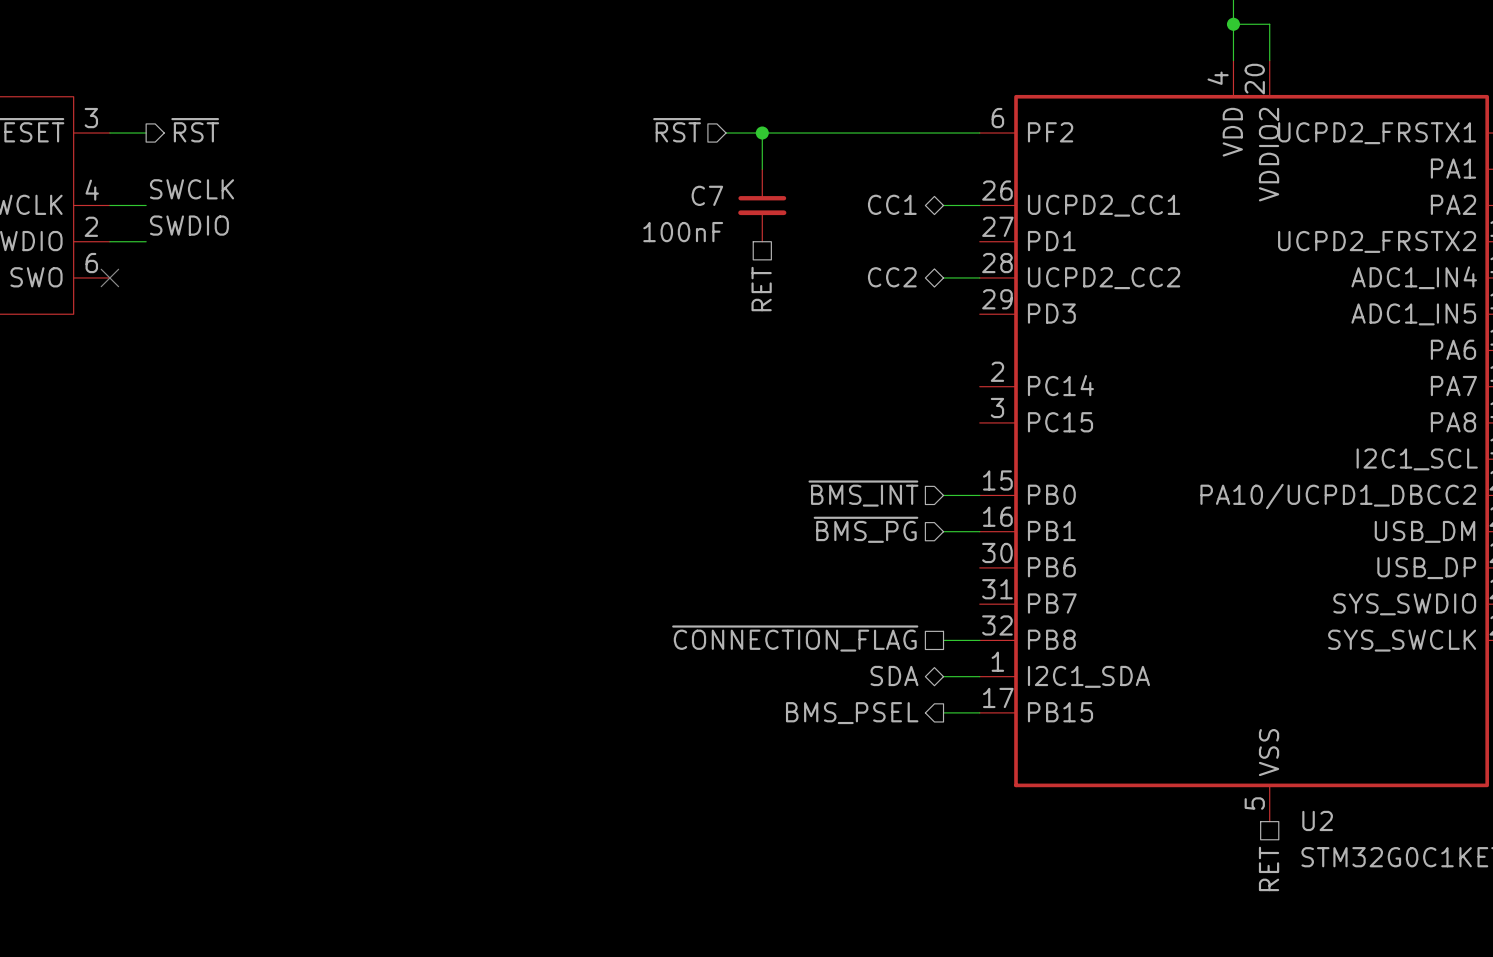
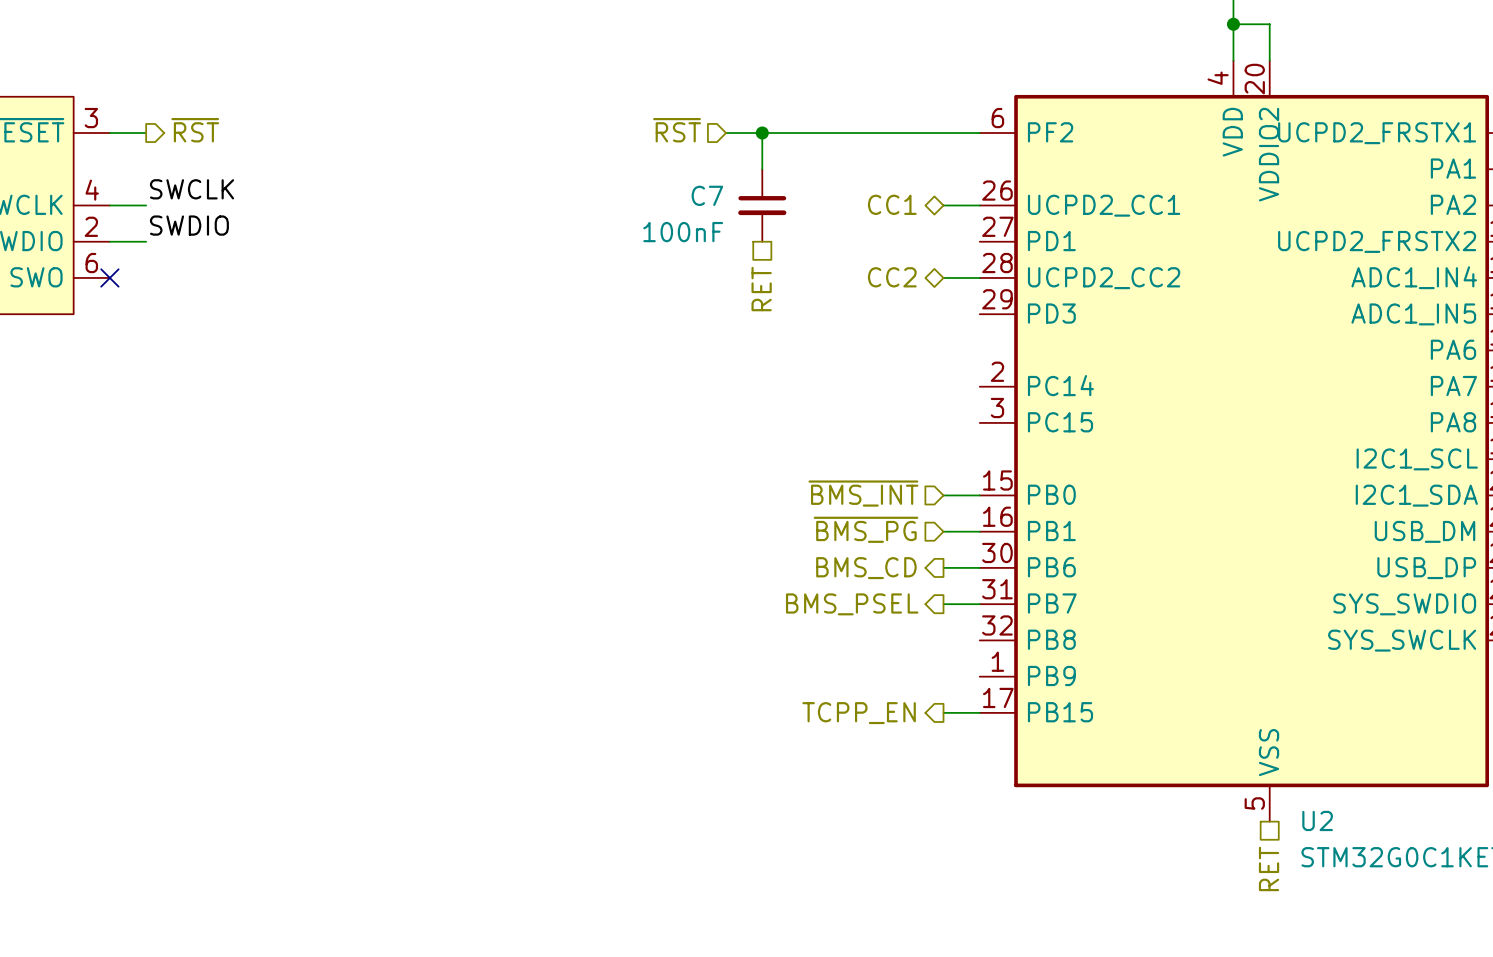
U2 pin name: PA10/UCPD1_DBCC2 (1338, 496) -> I2C1_SDA (1416, 495)
hierarchical label: none -> BMS_CD (866, 568)
hierarchical label: none -> BMS_PSEL (852, 604)
hierarchical label: ~{CONNECTION_FLAG} (795, 638) -> none
wire: (943, 640) (979, 640) -> (943, 604) (979, 604)
hierarchical label: SDA (894, 675) -> none
wire: (943, 676) (979, 676) -> (943, 567) (979, 567)
U2 pin name: I2C1_SDA (1088, 676) -> PB9 (1051, 675)
hierarchical label: BMS_PSEL (852, 713) -> TCPP_EN (859, 713)

